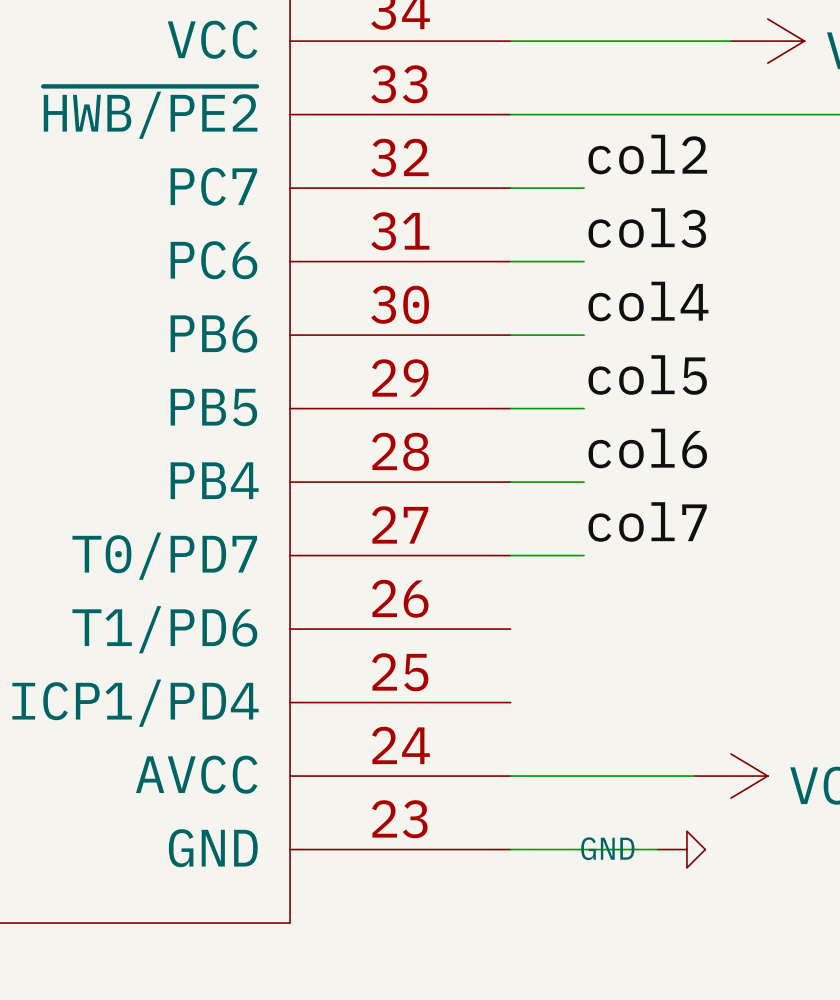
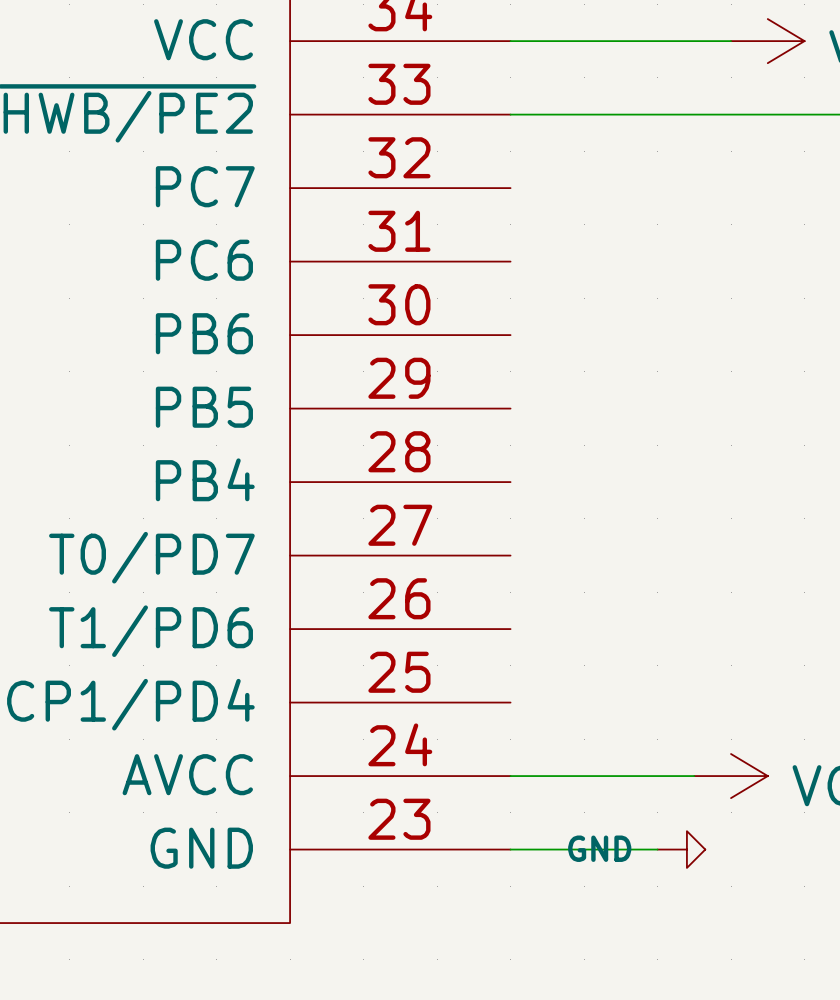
label: col2 (647, 154) -> none
wire: (510, 188) (584, 188) -> none
label: col3 (647, 228) -> none
wire: (510, 261) (584, 261) -> none
label: col4 (648, 301) -> none
wire: (510, 335) (584, 335) -> none
label: col5 (647, 375) -> none
wire: (510, 408) (584, 408) -> none
label: col6 (647, 448) -> none
wire: (510, 482) (584, 482) -> none
label: col7 (647, 521) -> none
wire: (510, 555) (584, 555) -> none

